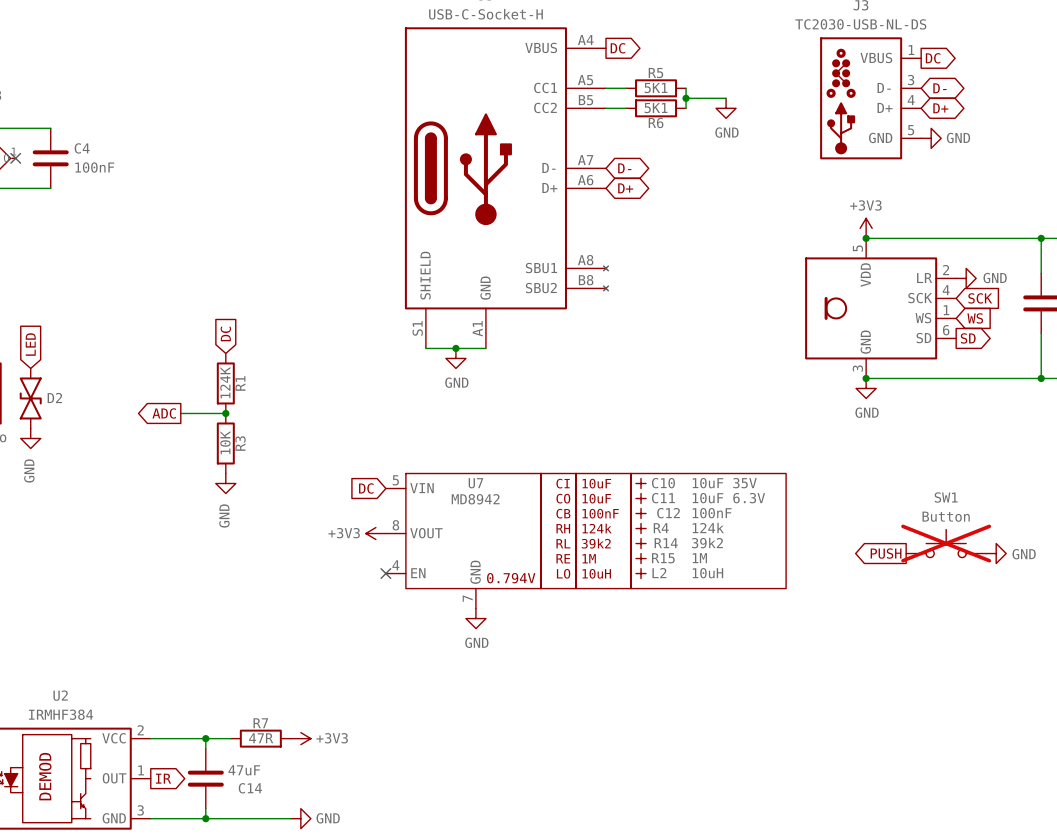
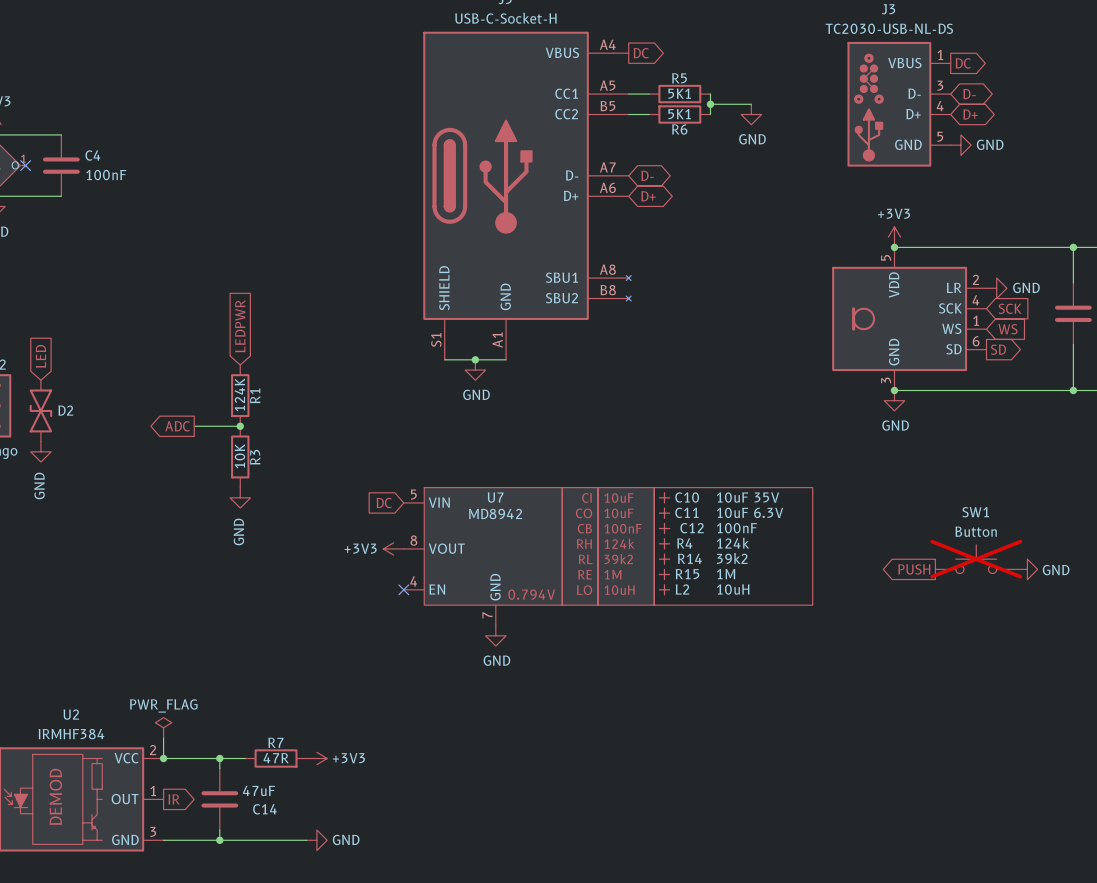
global label: DC (225, 334) -> LEDPWR (240, 326)
power symbol: none -> PWR_FLAG (163, 727)
wire: none -> (163, 738) (163, 758)
junction: none -> (163, 758)

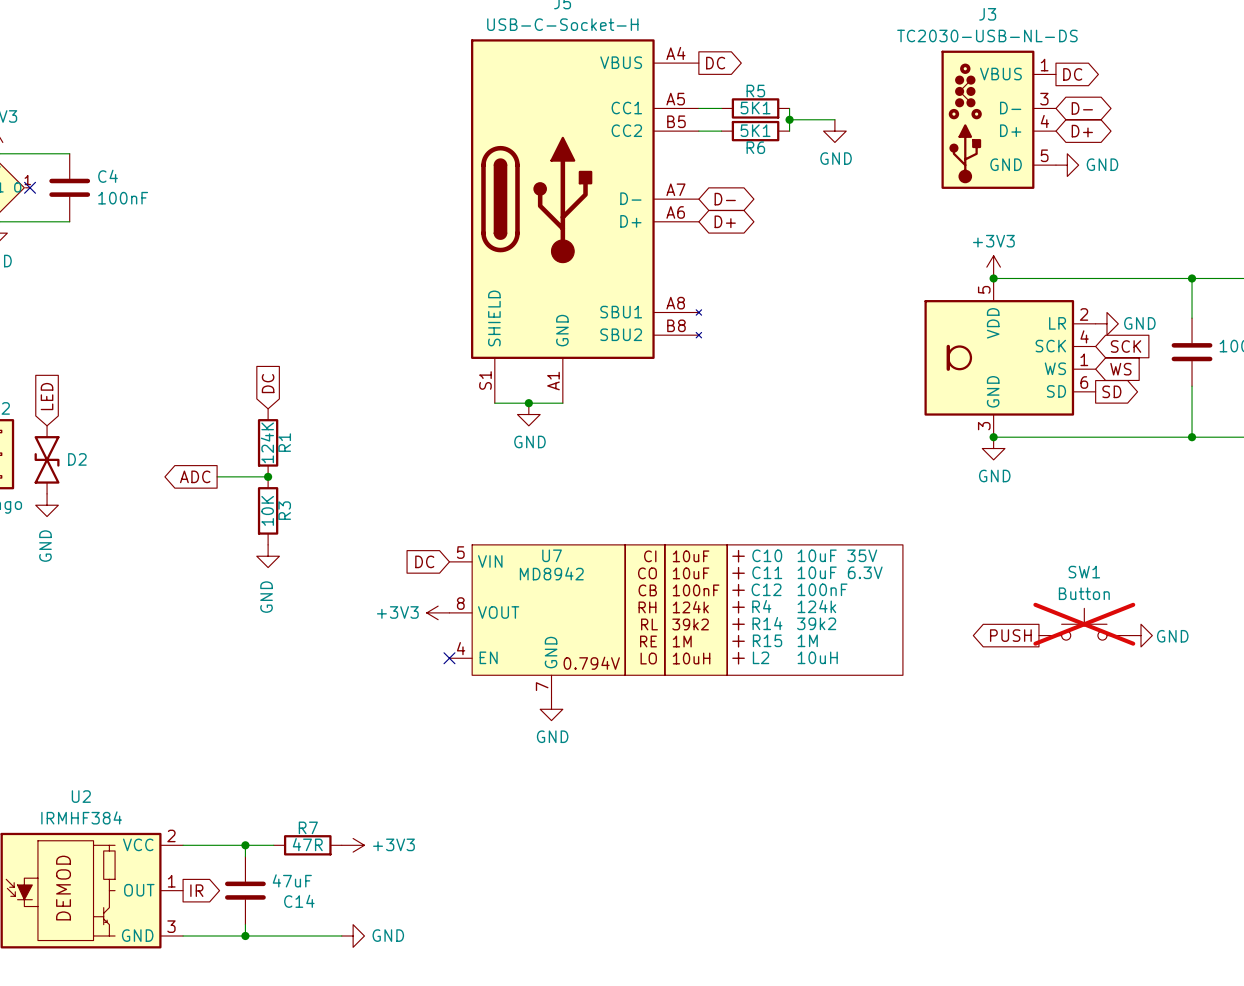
global label: LEDPWR (240, 326) -> DC (268, 383)
power symbol: PWR_FLAG (163, 727) -> none
wire: (163, 738) (163, 758) -> none
junction: (163, 758) -> none

